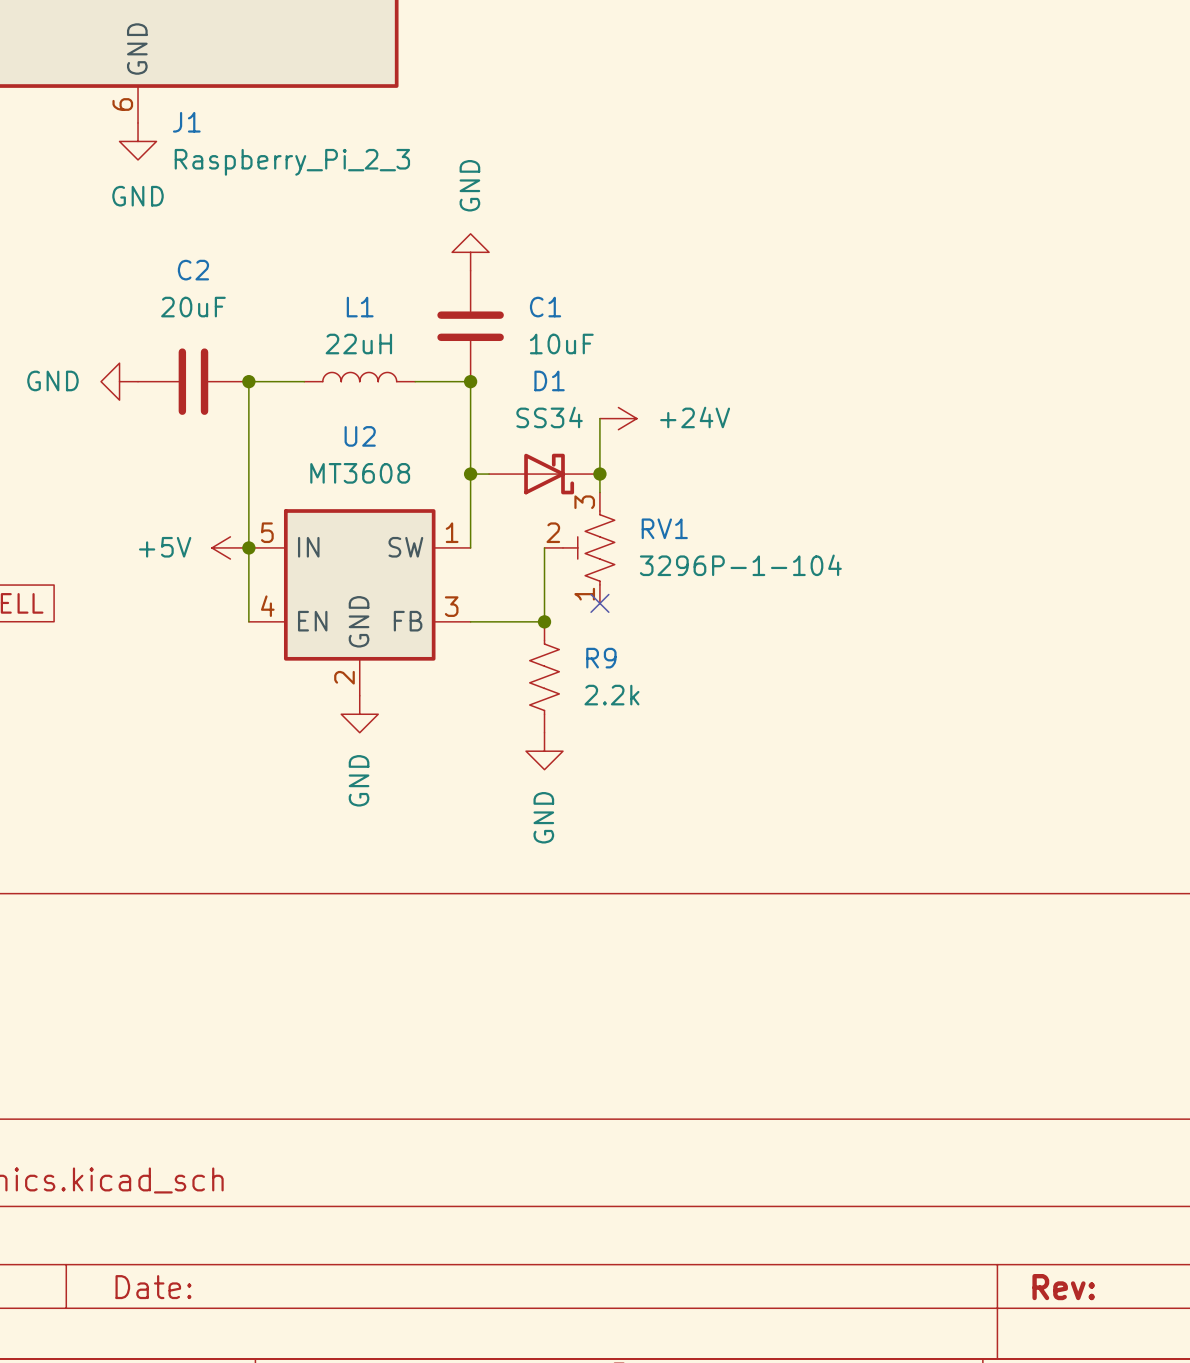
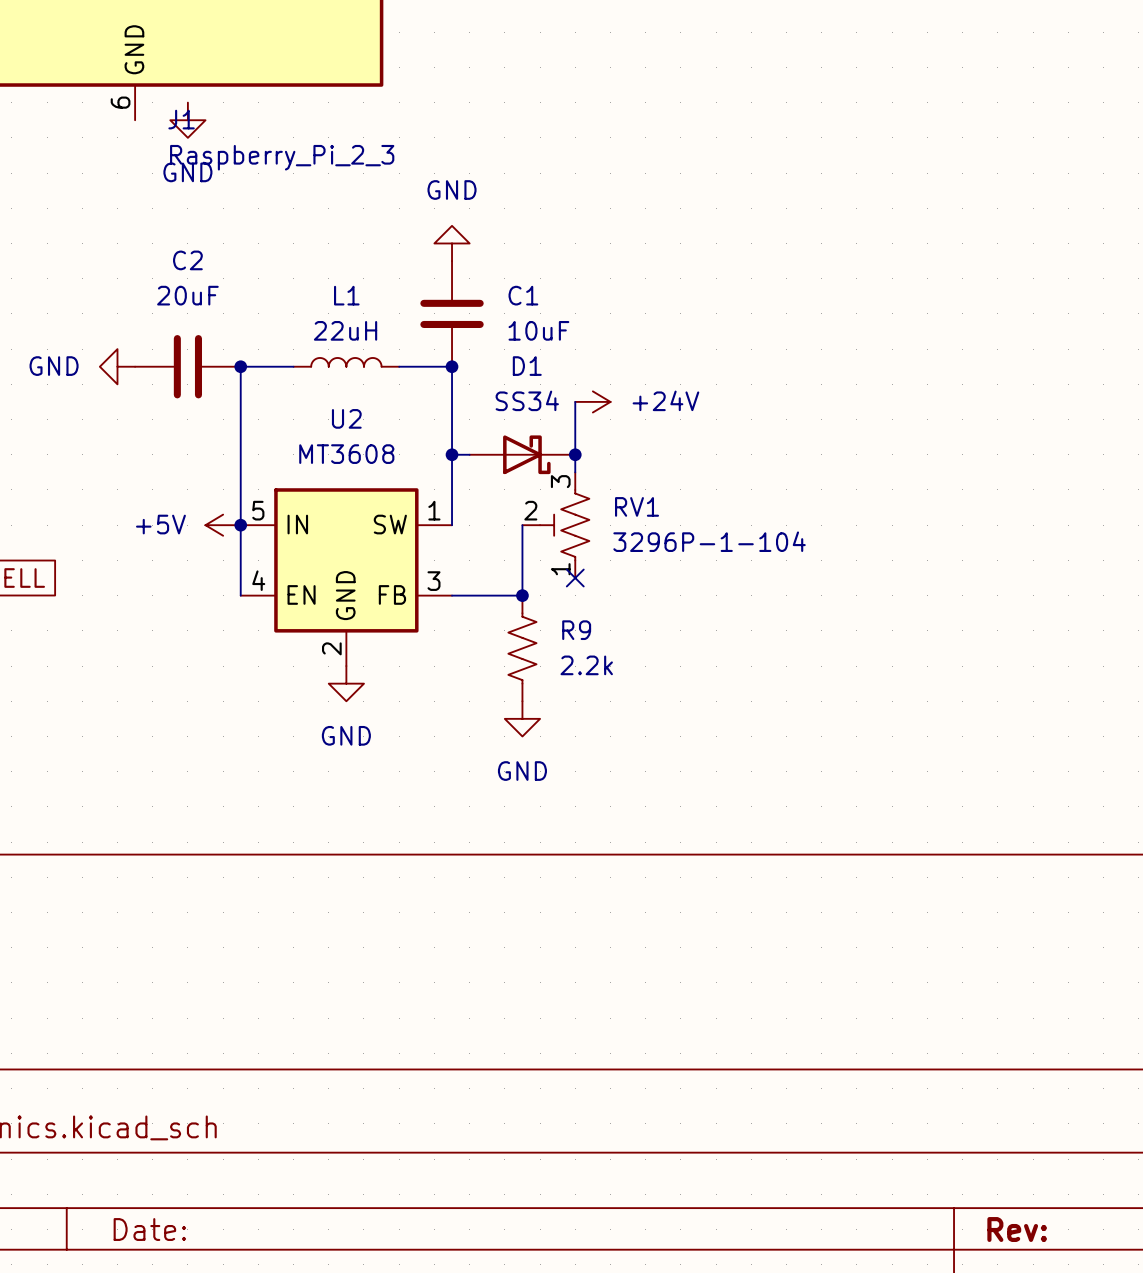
power symbol position: GND (138, 141) -> GND (187, 120)
power symbol text rotation: 0° (469, 185) -> 90° clockwise (452, 190)
power symbol text rotation: 0° (359, 780) -> 90° clockwise (346, 735)
power symbol text rotation: 0° (543, 817) -> 90° clockwise (522, 771)

